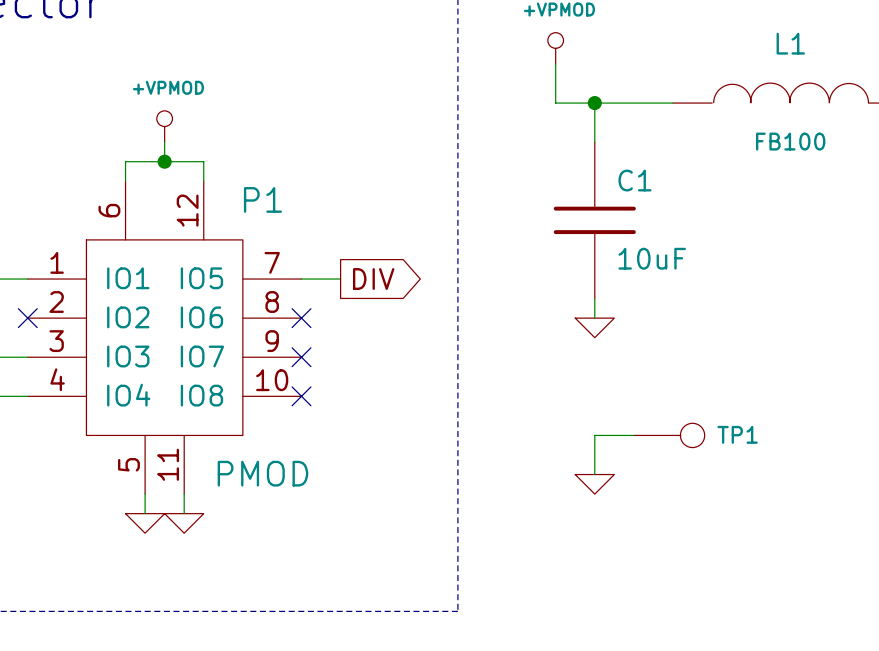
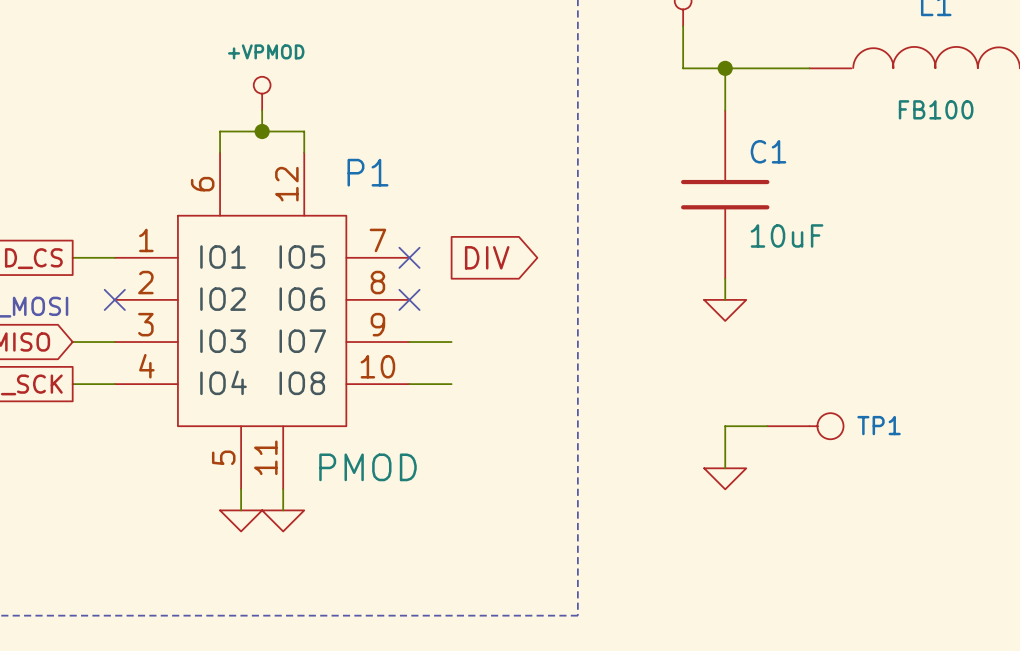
wire: (301, 279) (340, 279) -> (409, 342) (451, 342)
no-connect mark: none -> (409, 257)
no-connect mark: (301, 357) -> none
wire: none -> (409, 384) (451, 384)
no-connect mark: (301, 396) -> none

